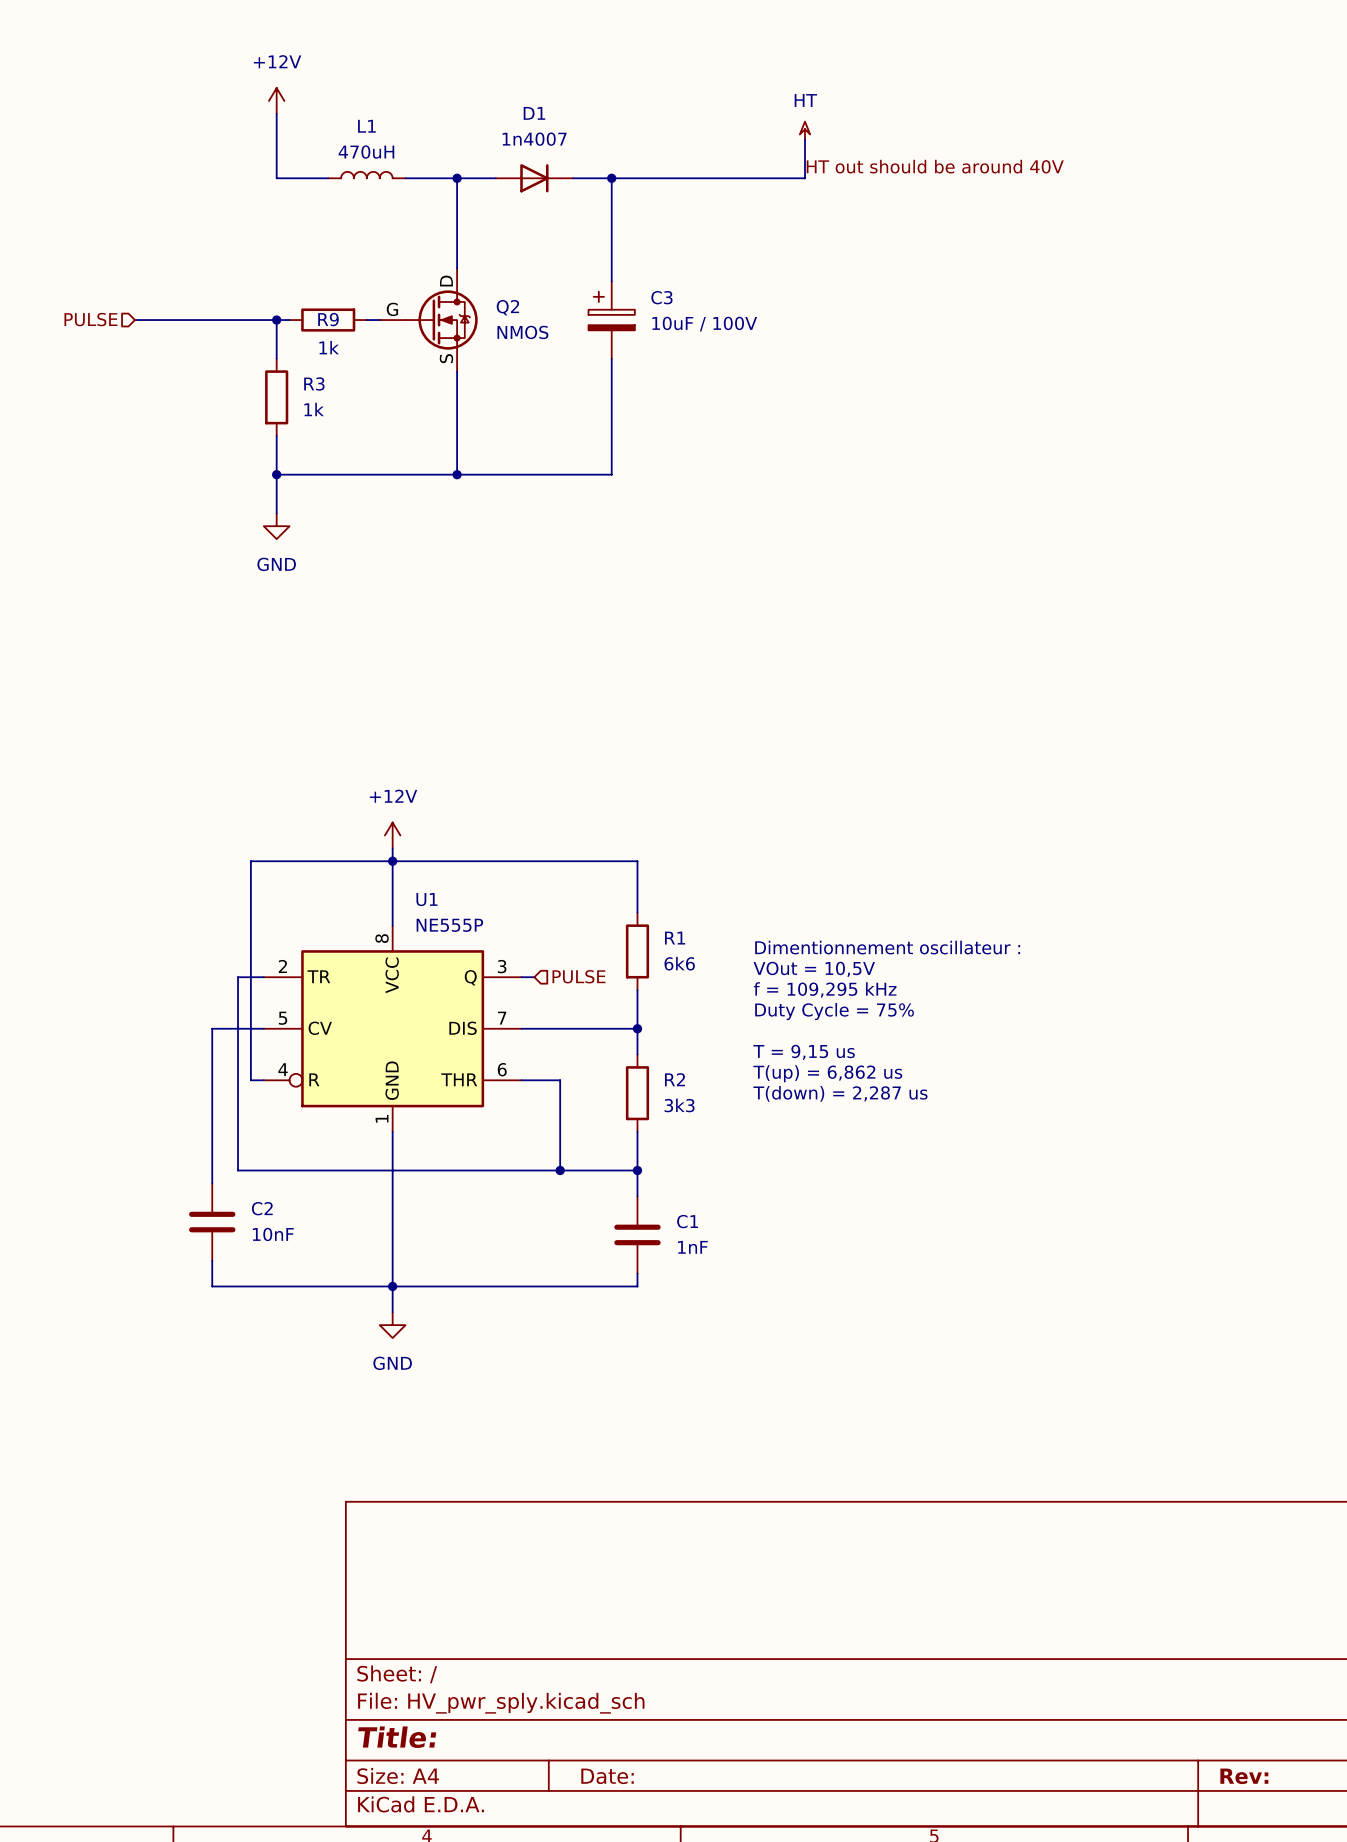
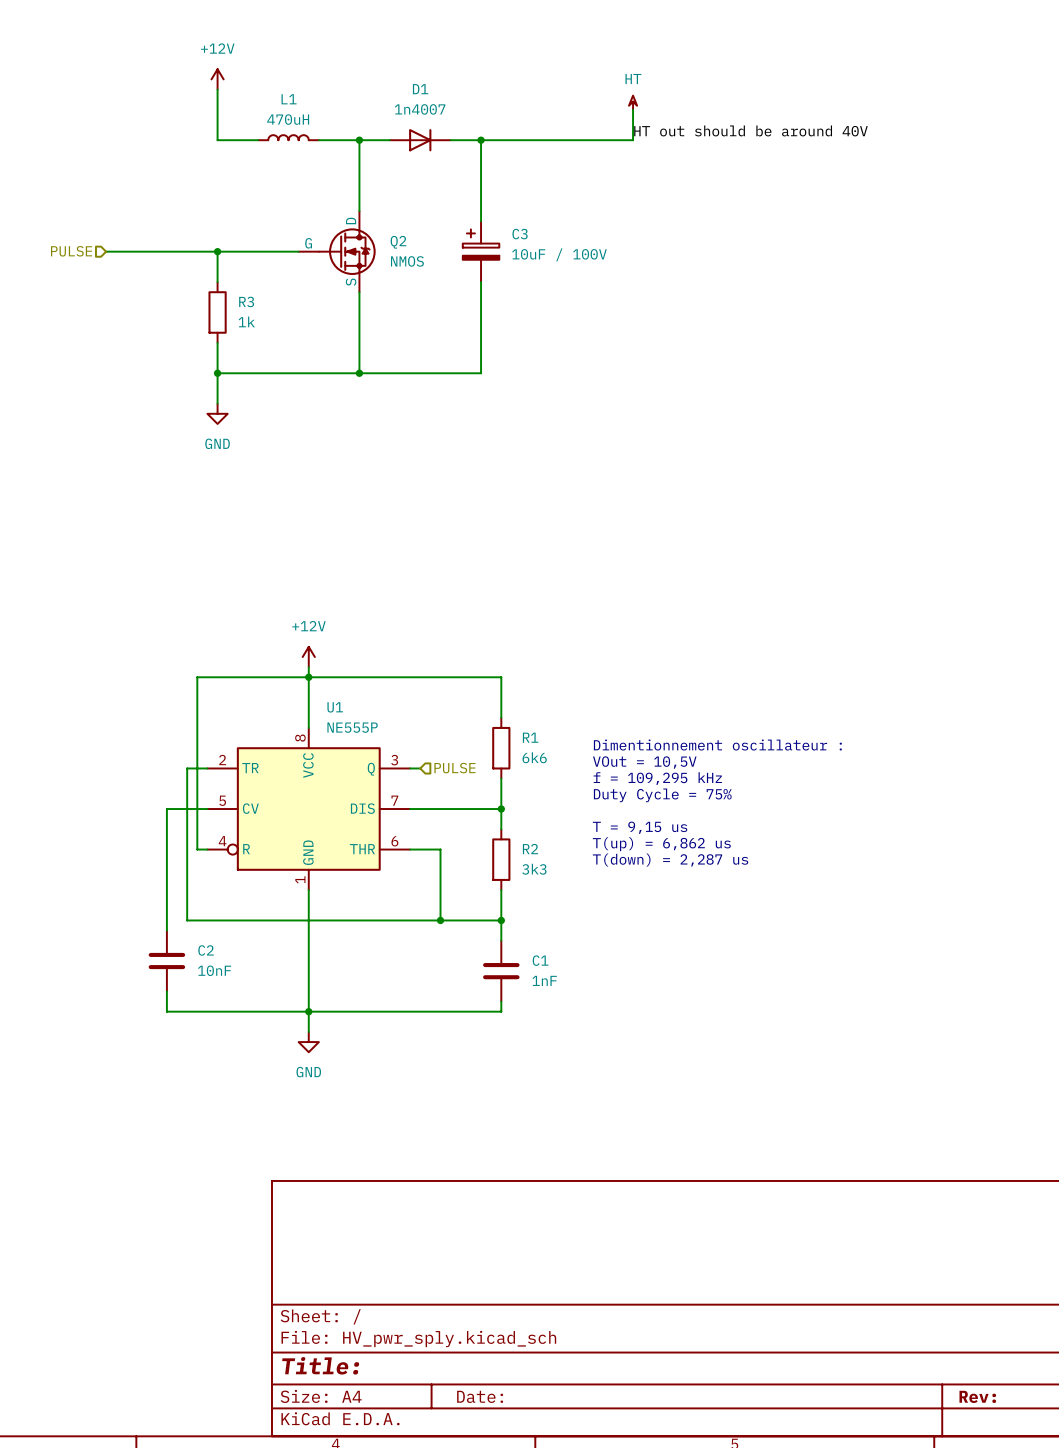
wire: none -> (227, 251) (288, 251)
R9: 1k (328, 320) -> none

